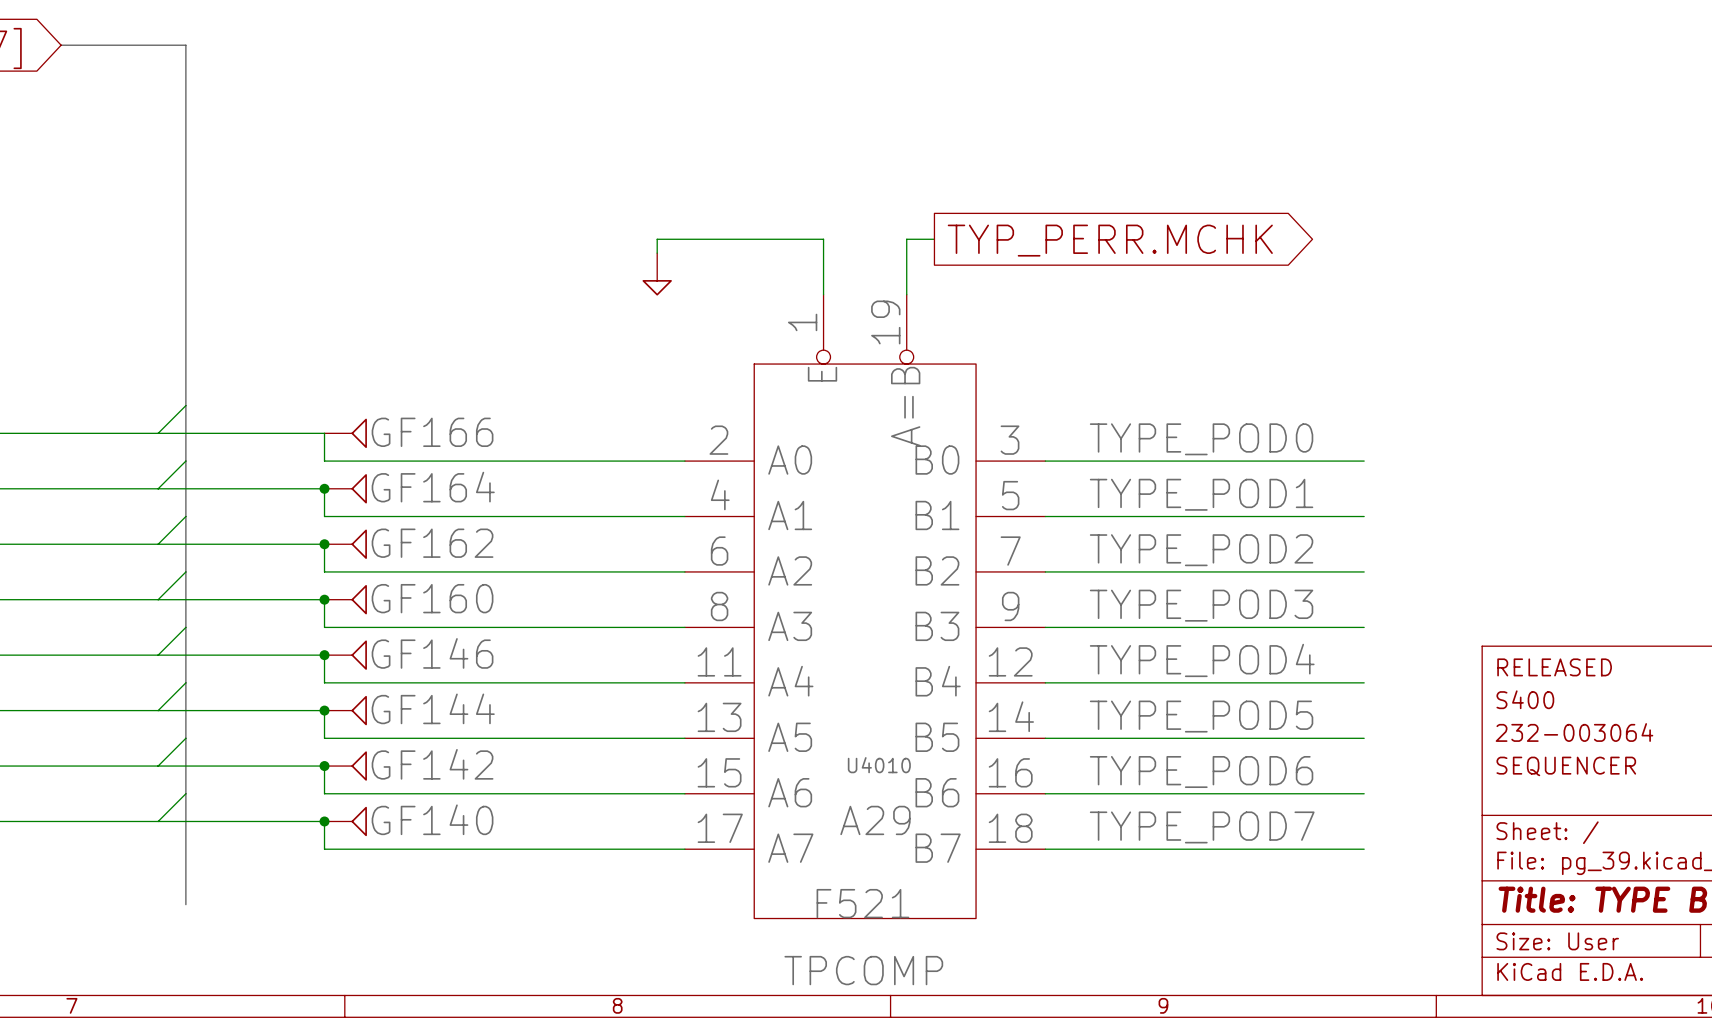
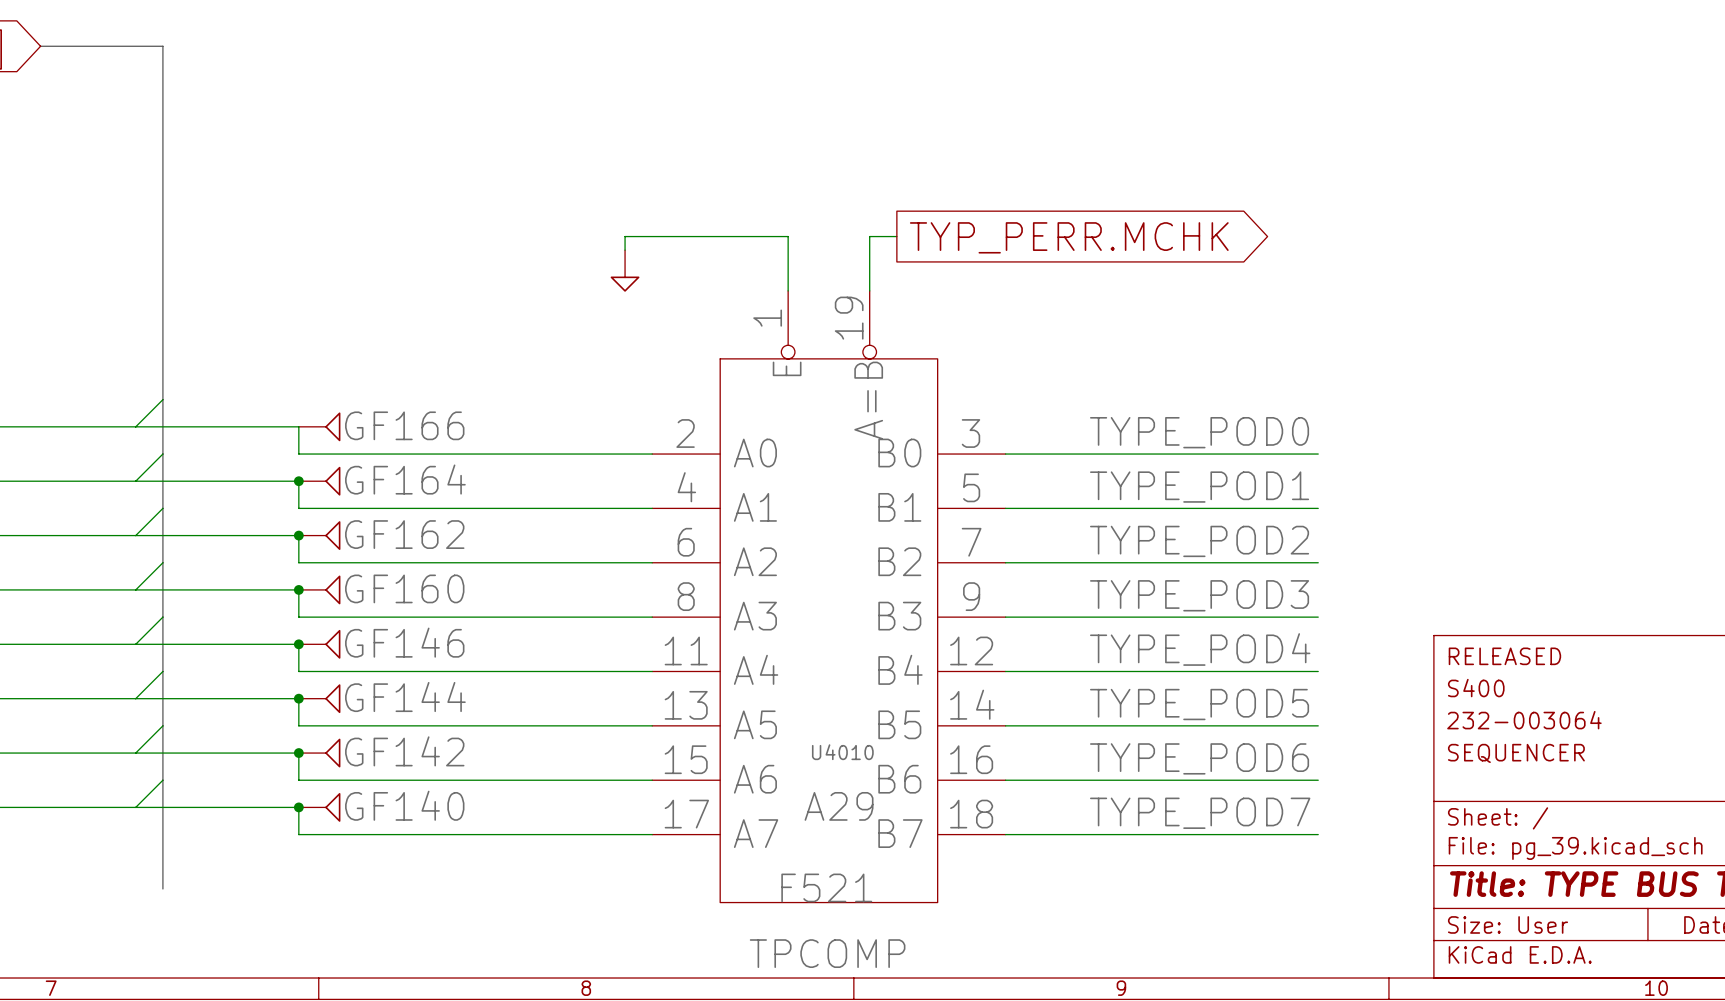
label position: TYPE_POD0 (1201, 439) -> TYPE_POD0 (1199, 432)
label position: TYPE_POD1 (1201, 494) -> TYPE_POD1 (1199, 487)
label position: TYPE_POD2 (1201, 550) -> TYPE_POD2 (1199, 541)
label position: TYPE_POD3 (1201, 605) -> TYPE_POD3 (1199, 595)
label position: TYPE_POD4 (1202, 660) -> TYPE_POD4 (1200, 649)
label position: TYPE_POD5 (1201, 716) -> TYPE_POD5 (1199, 704)
label position: TYPE_POD6 (1201, 772) -> TYPE_POD6 (1199, 758)
label position: TYPE_POD7 (1202, 827) -> TYPE_POD7 (1200, 813)

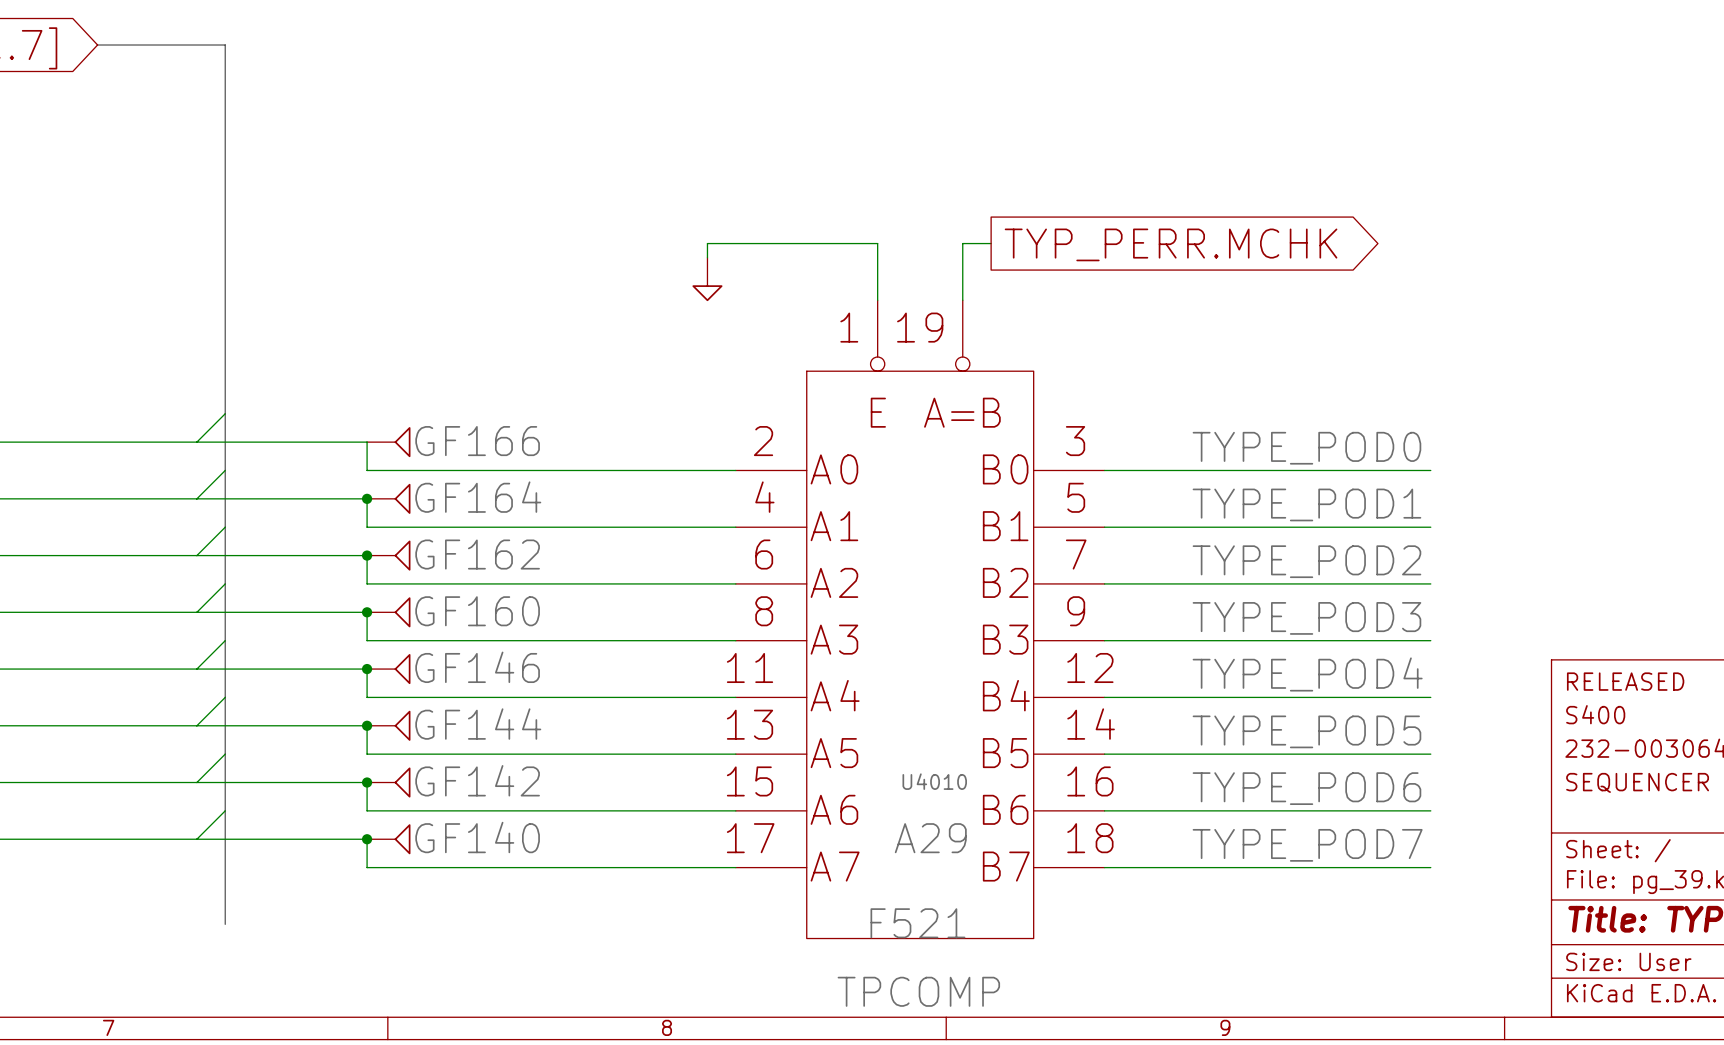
U4010 symbol: [652, 290, 1006, 903] -> [735, 300, 1105, 939]

